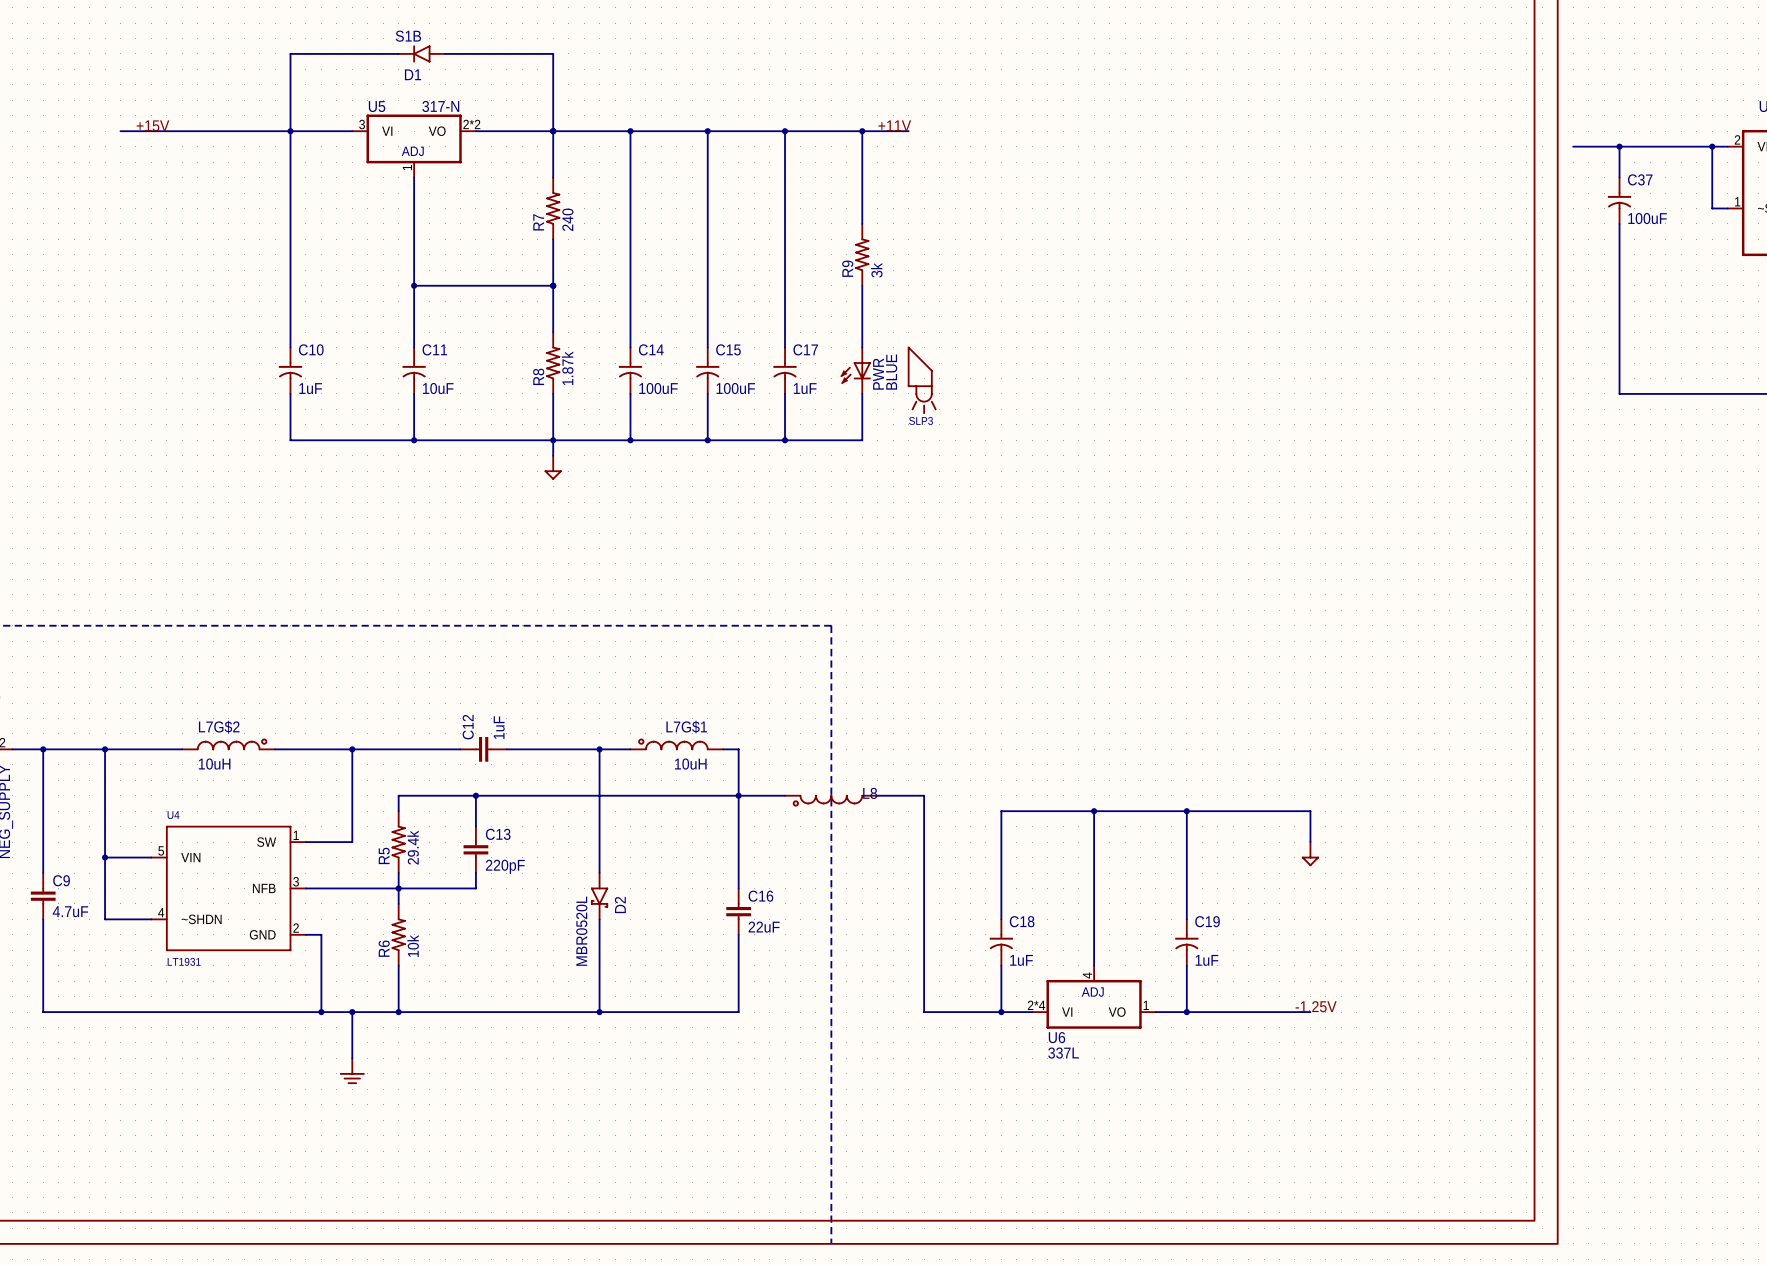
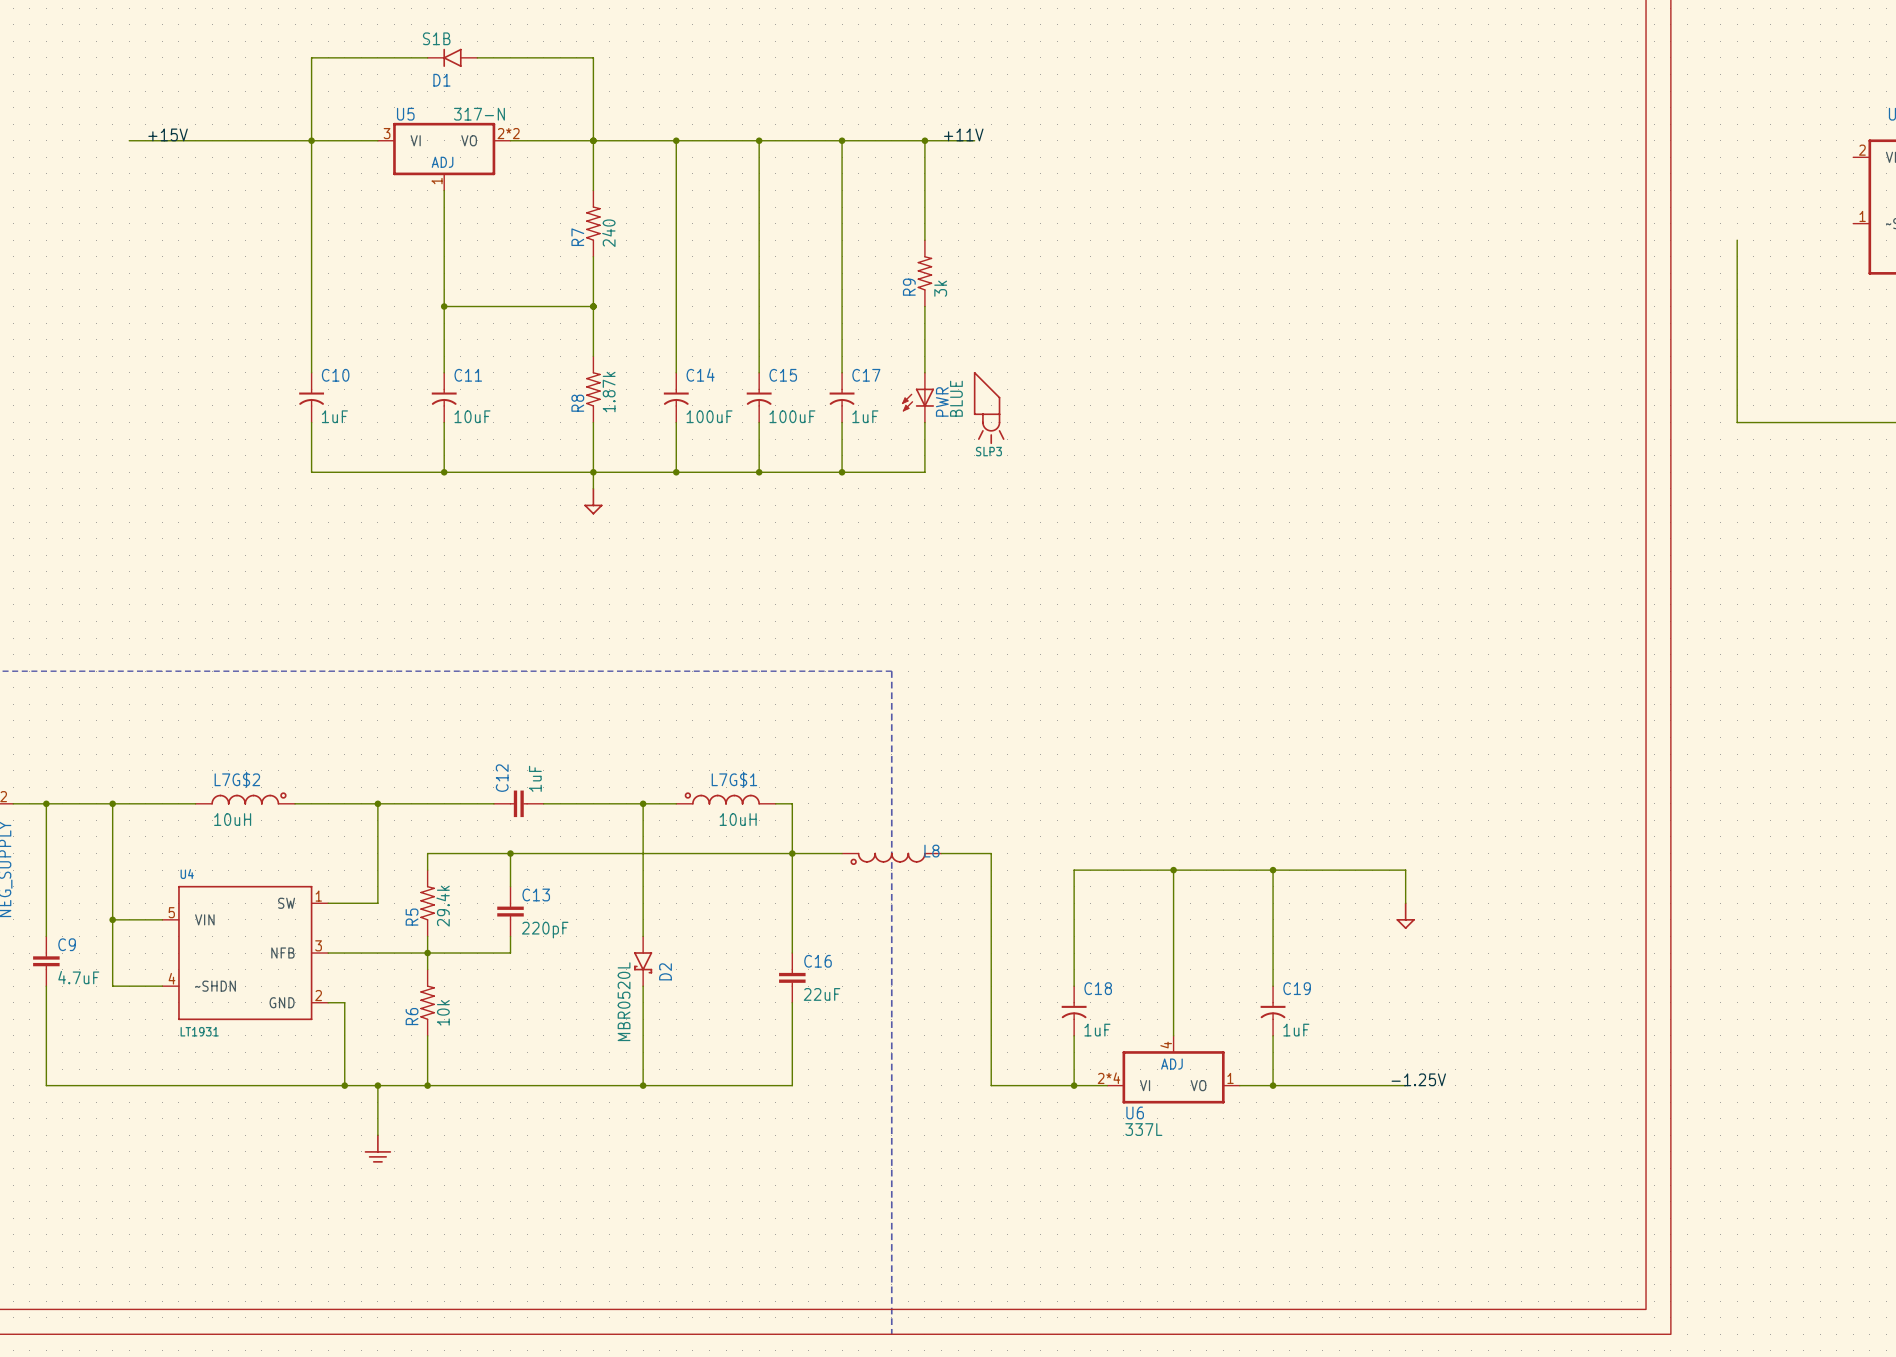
wire: (1573, 146) (1727, 146) -> none
wire: (1619, 146) (1619, 177) -> none
junction: (1619, 146) -> none
wire: (1712, 146) (1712, 208) (1727, 208) -> none
junction: (1712, 146) -> none
C37: 100uF (1619, 200) -> none

